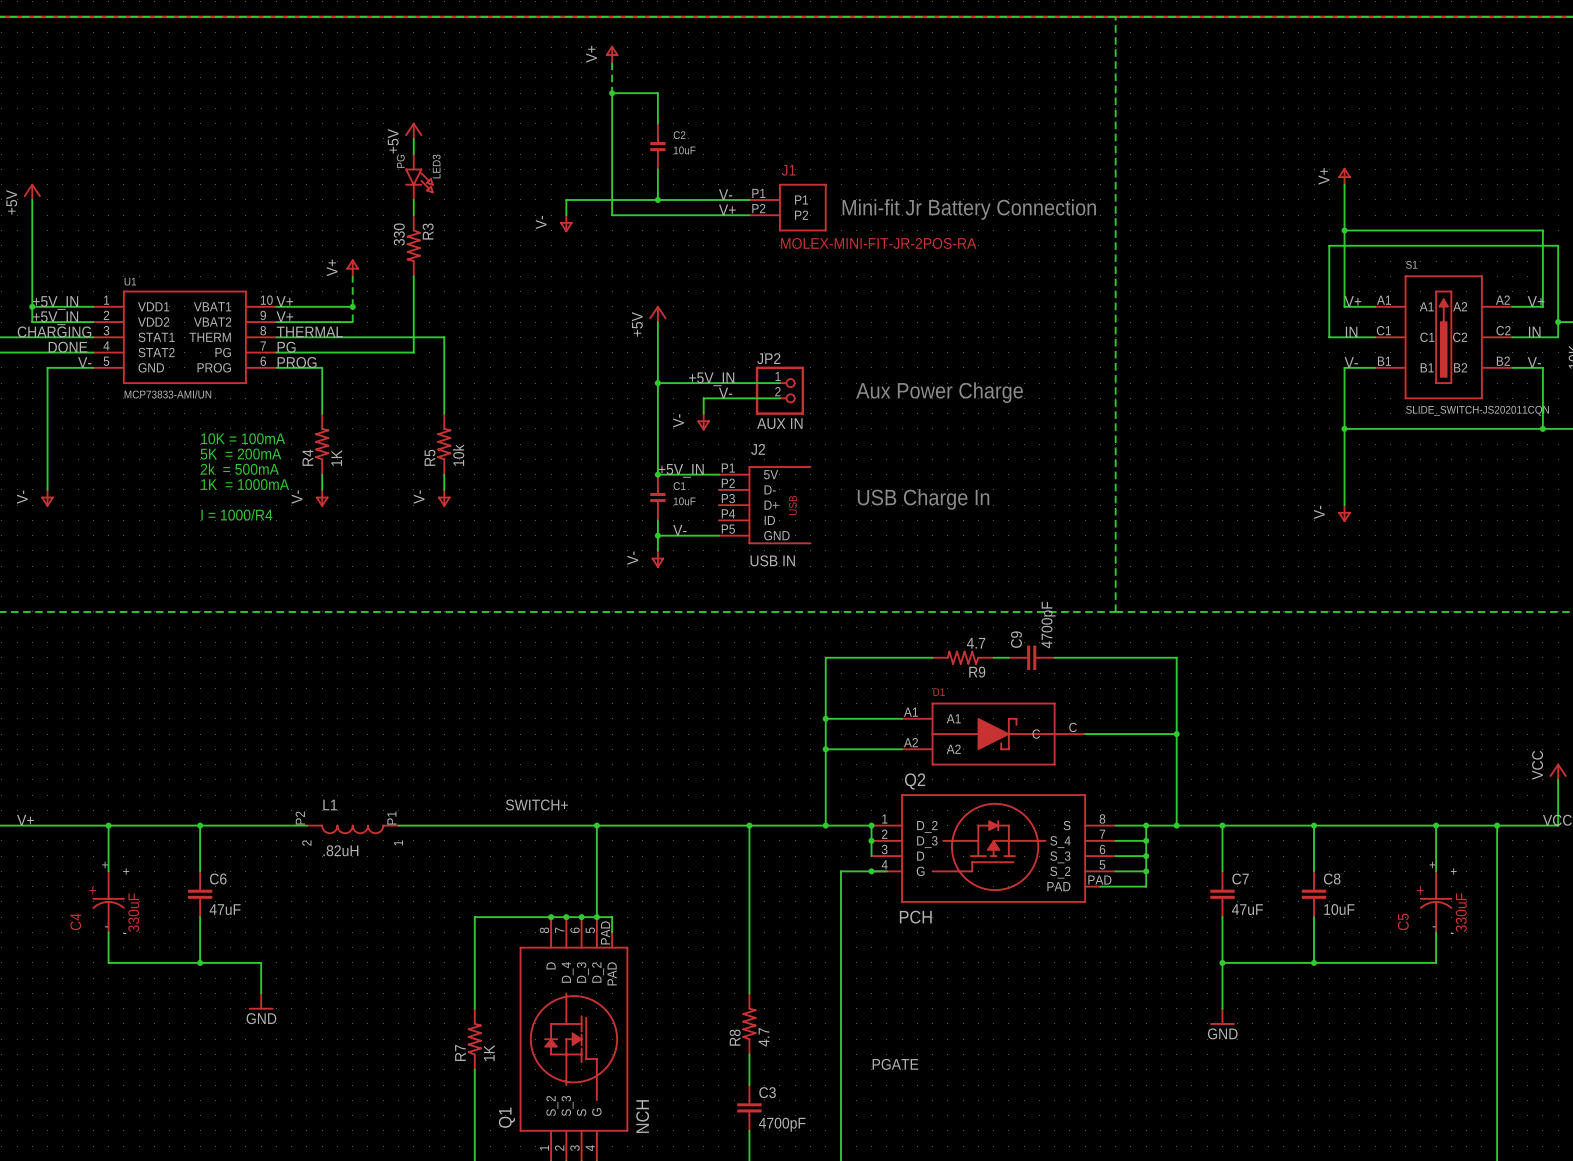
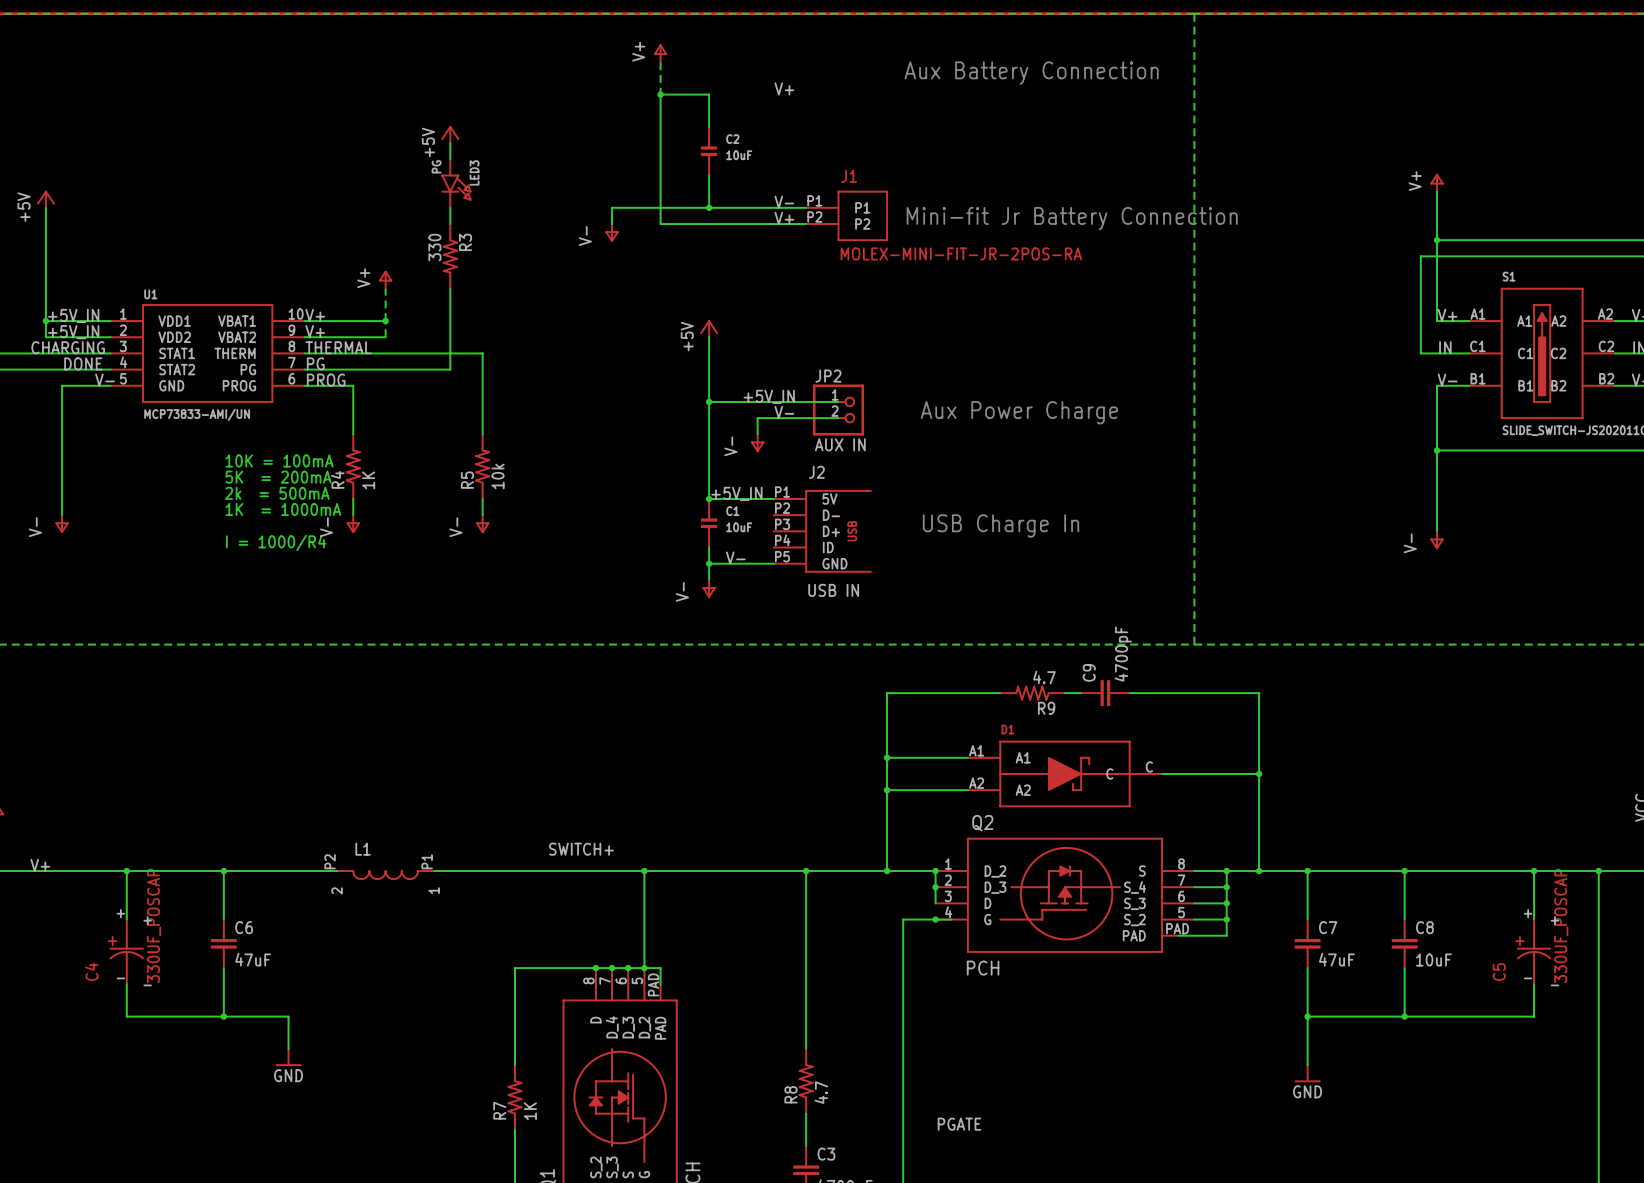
text: none -> Aux Battery Connection (1031, 73)
label: none -> V+ (784, 88)
L1 value: .82uH (340, 850) -> none
C4 value: 330uF (133, 912) -> 330UF_POSCAP (154, 925)
C5 value: 330uF (1461, 912) -> 330UF_POSCAP (1561, 925)

